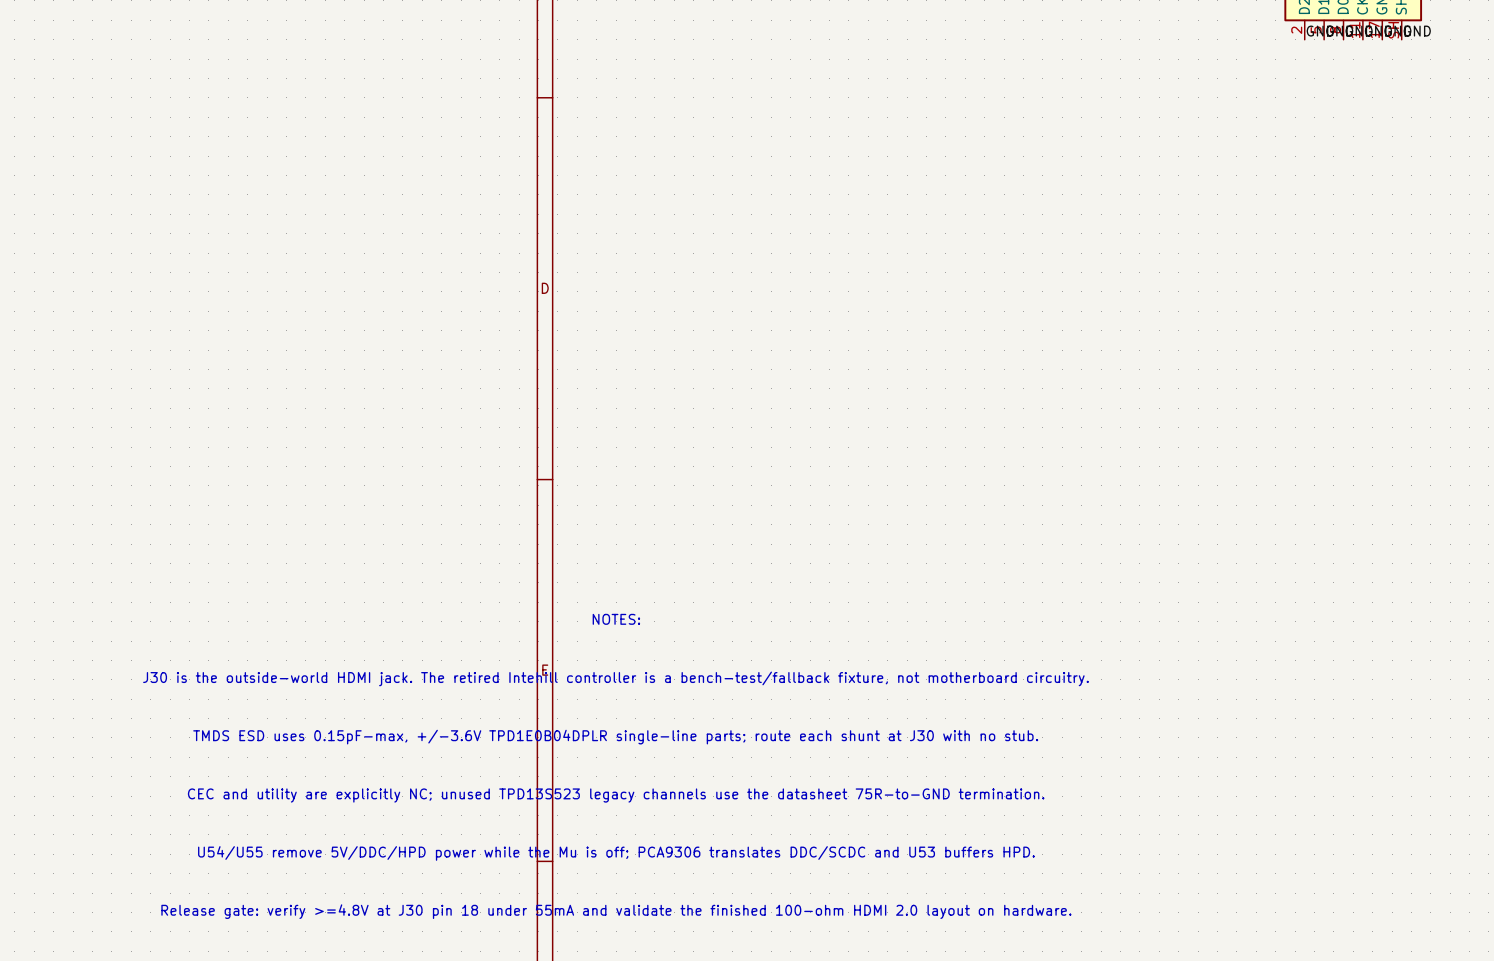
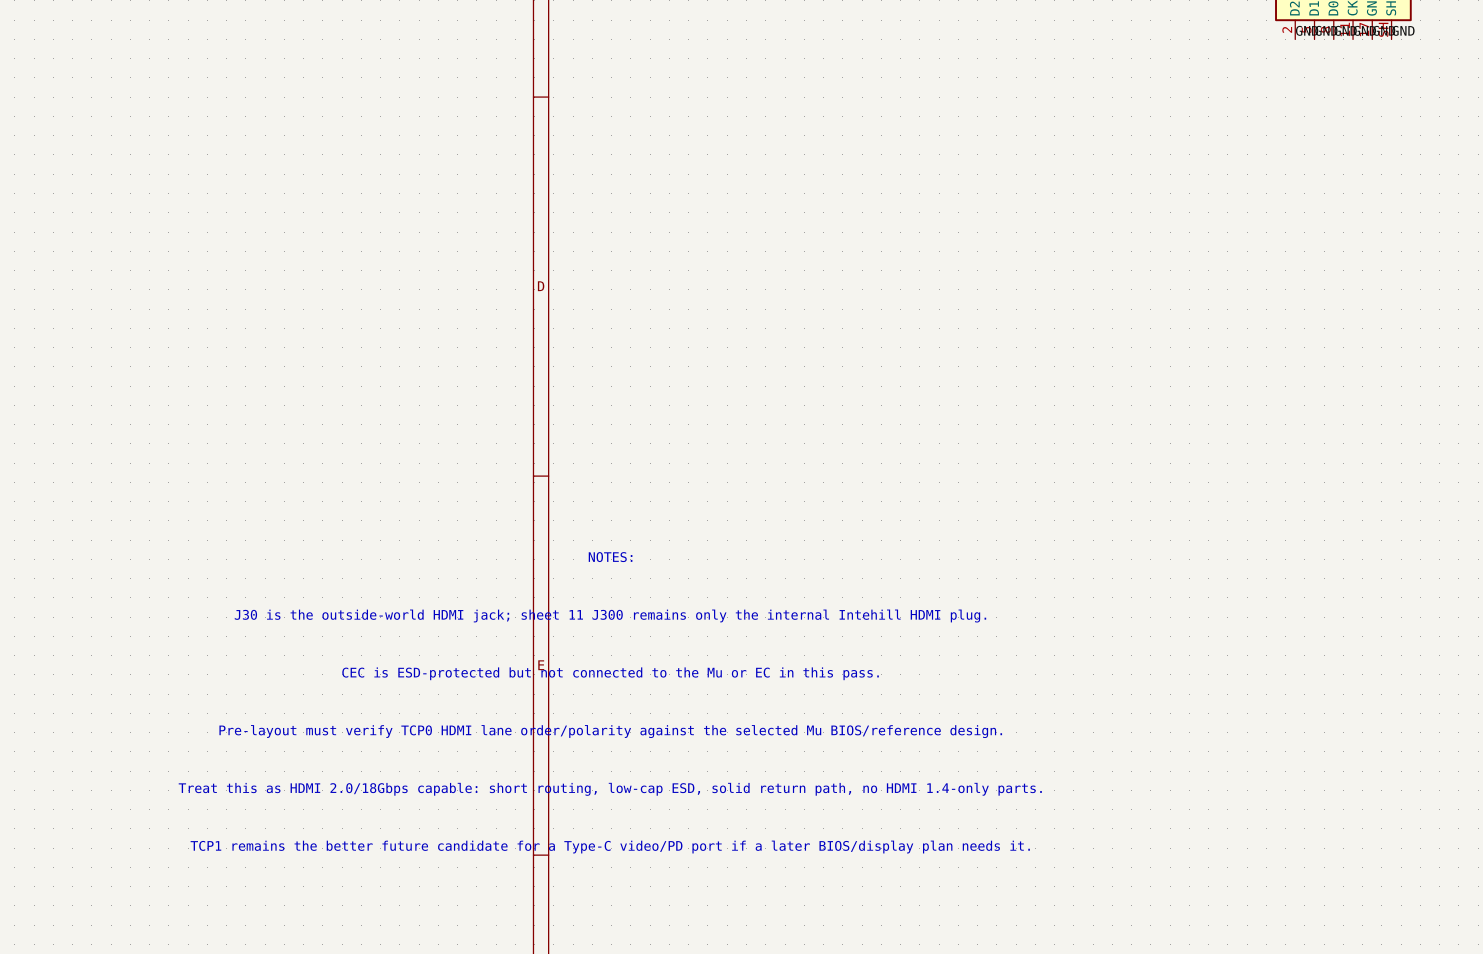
text: none -> NOTES: (610, 557)
text: NOTES: (616, 619) -> J30 is the outside-world HDMI jack; sheet 11 J300 remains only the internal Intehill HDMI plug. (610, 616)
text: J30 is the outside-world HDMI jack. The retired Intehill controller is a bench-test/fallback fixture, not motherboard circuitry. (615, 678) -> CEC is ESD-protected but not connected to the Mu or EC in this pass. (610, 673)
text: TMDS ESD uses 0.15pF-max, +/-3.6V TPD1E0B04DPLR single-line parts; route each shunt at J30 with no stub. (615, 737) -> Pre-layout must verify TCP0 HDMI lane order/polarity against the selected Mu BIOS/reference design. (610, 731)
text: CEC and utility are explicitly NC; unused TPD13S523 legacy channels use the datasheet 75R-to-GND termination. (616, 795) -> Treat this as HDMI 2.0/18Gbps capable: short routing, low-cap ESD, solid return path, no HDMI 1.4-only parts. (610, 789)
text: U54/U55 remove 5V/DDC/HPD power while the Mu is off; PCA9306 translates DDC/SCDC and U53 buffers HPD. (616, 853) -> TCP1 remains the better future candidate for a Type-C video/PD port if a later BIOS/display plan needs it. (610, 847)
text: Release gate: verify >=4.8V at J30 pin 18 under 55mA and validate the finished 100-ohm HDMI 2.0 layout on hardware. (616, 911) -> none

